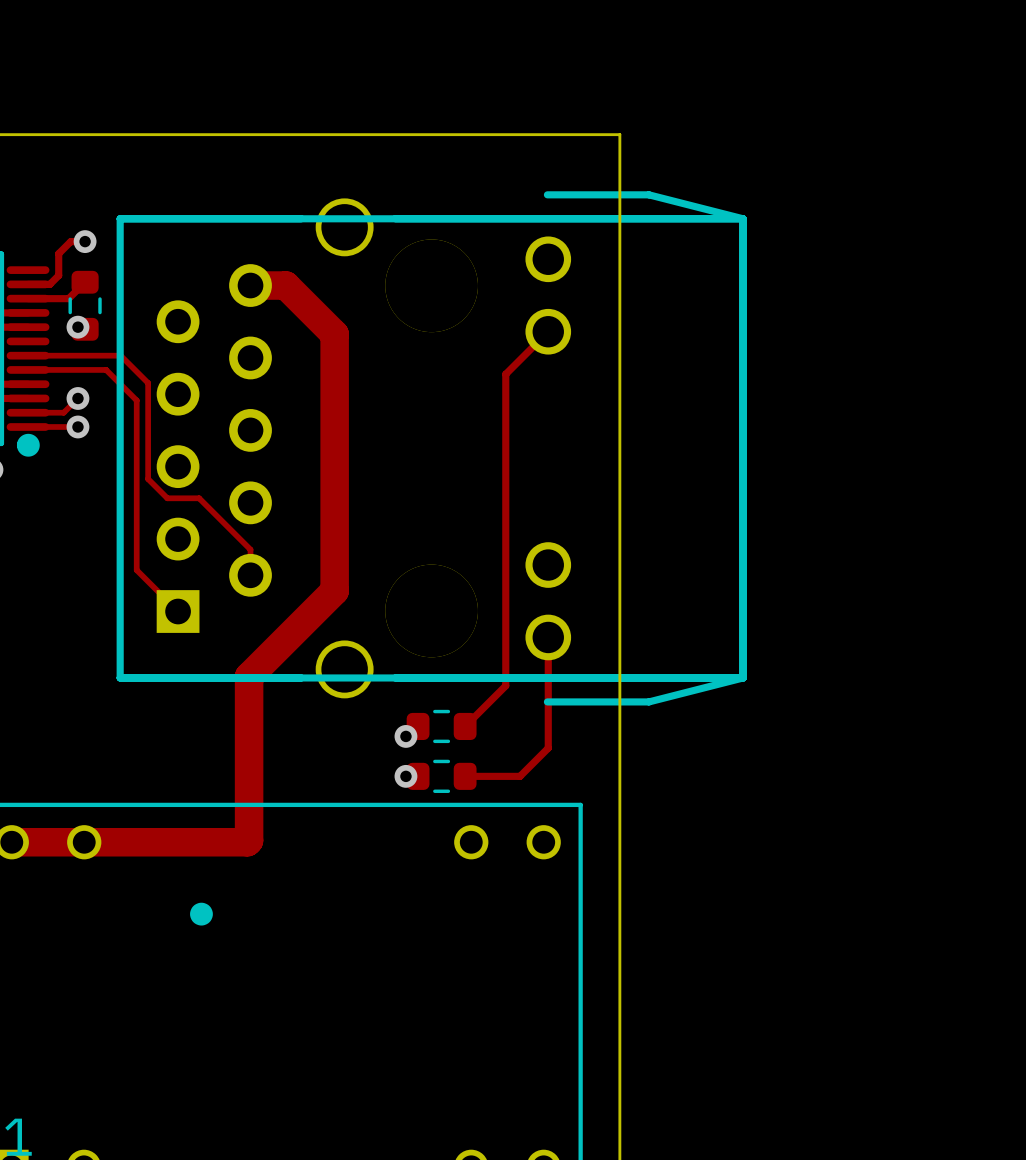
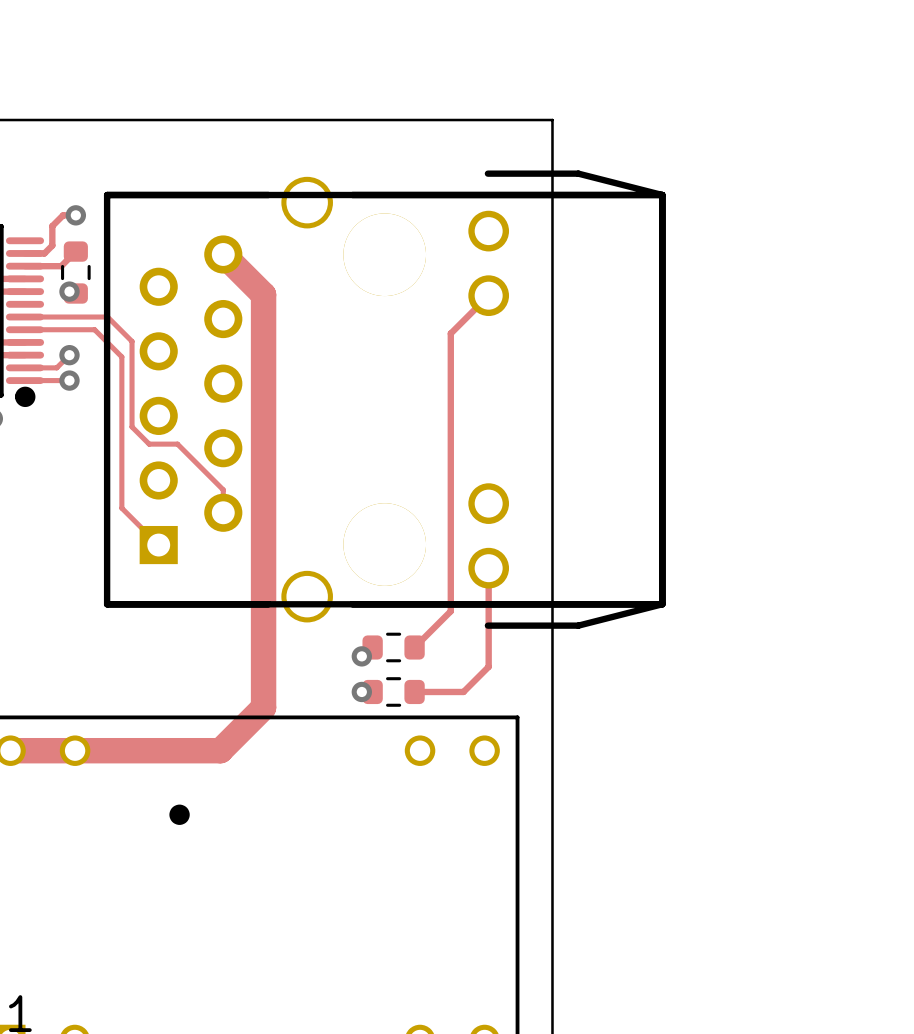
track: (250, 285) (285, 285) (334, 334) (334, 590) (249, 676) (249, 840) -> (223, 254) (263, 294) (263, 707) (222, 749)

